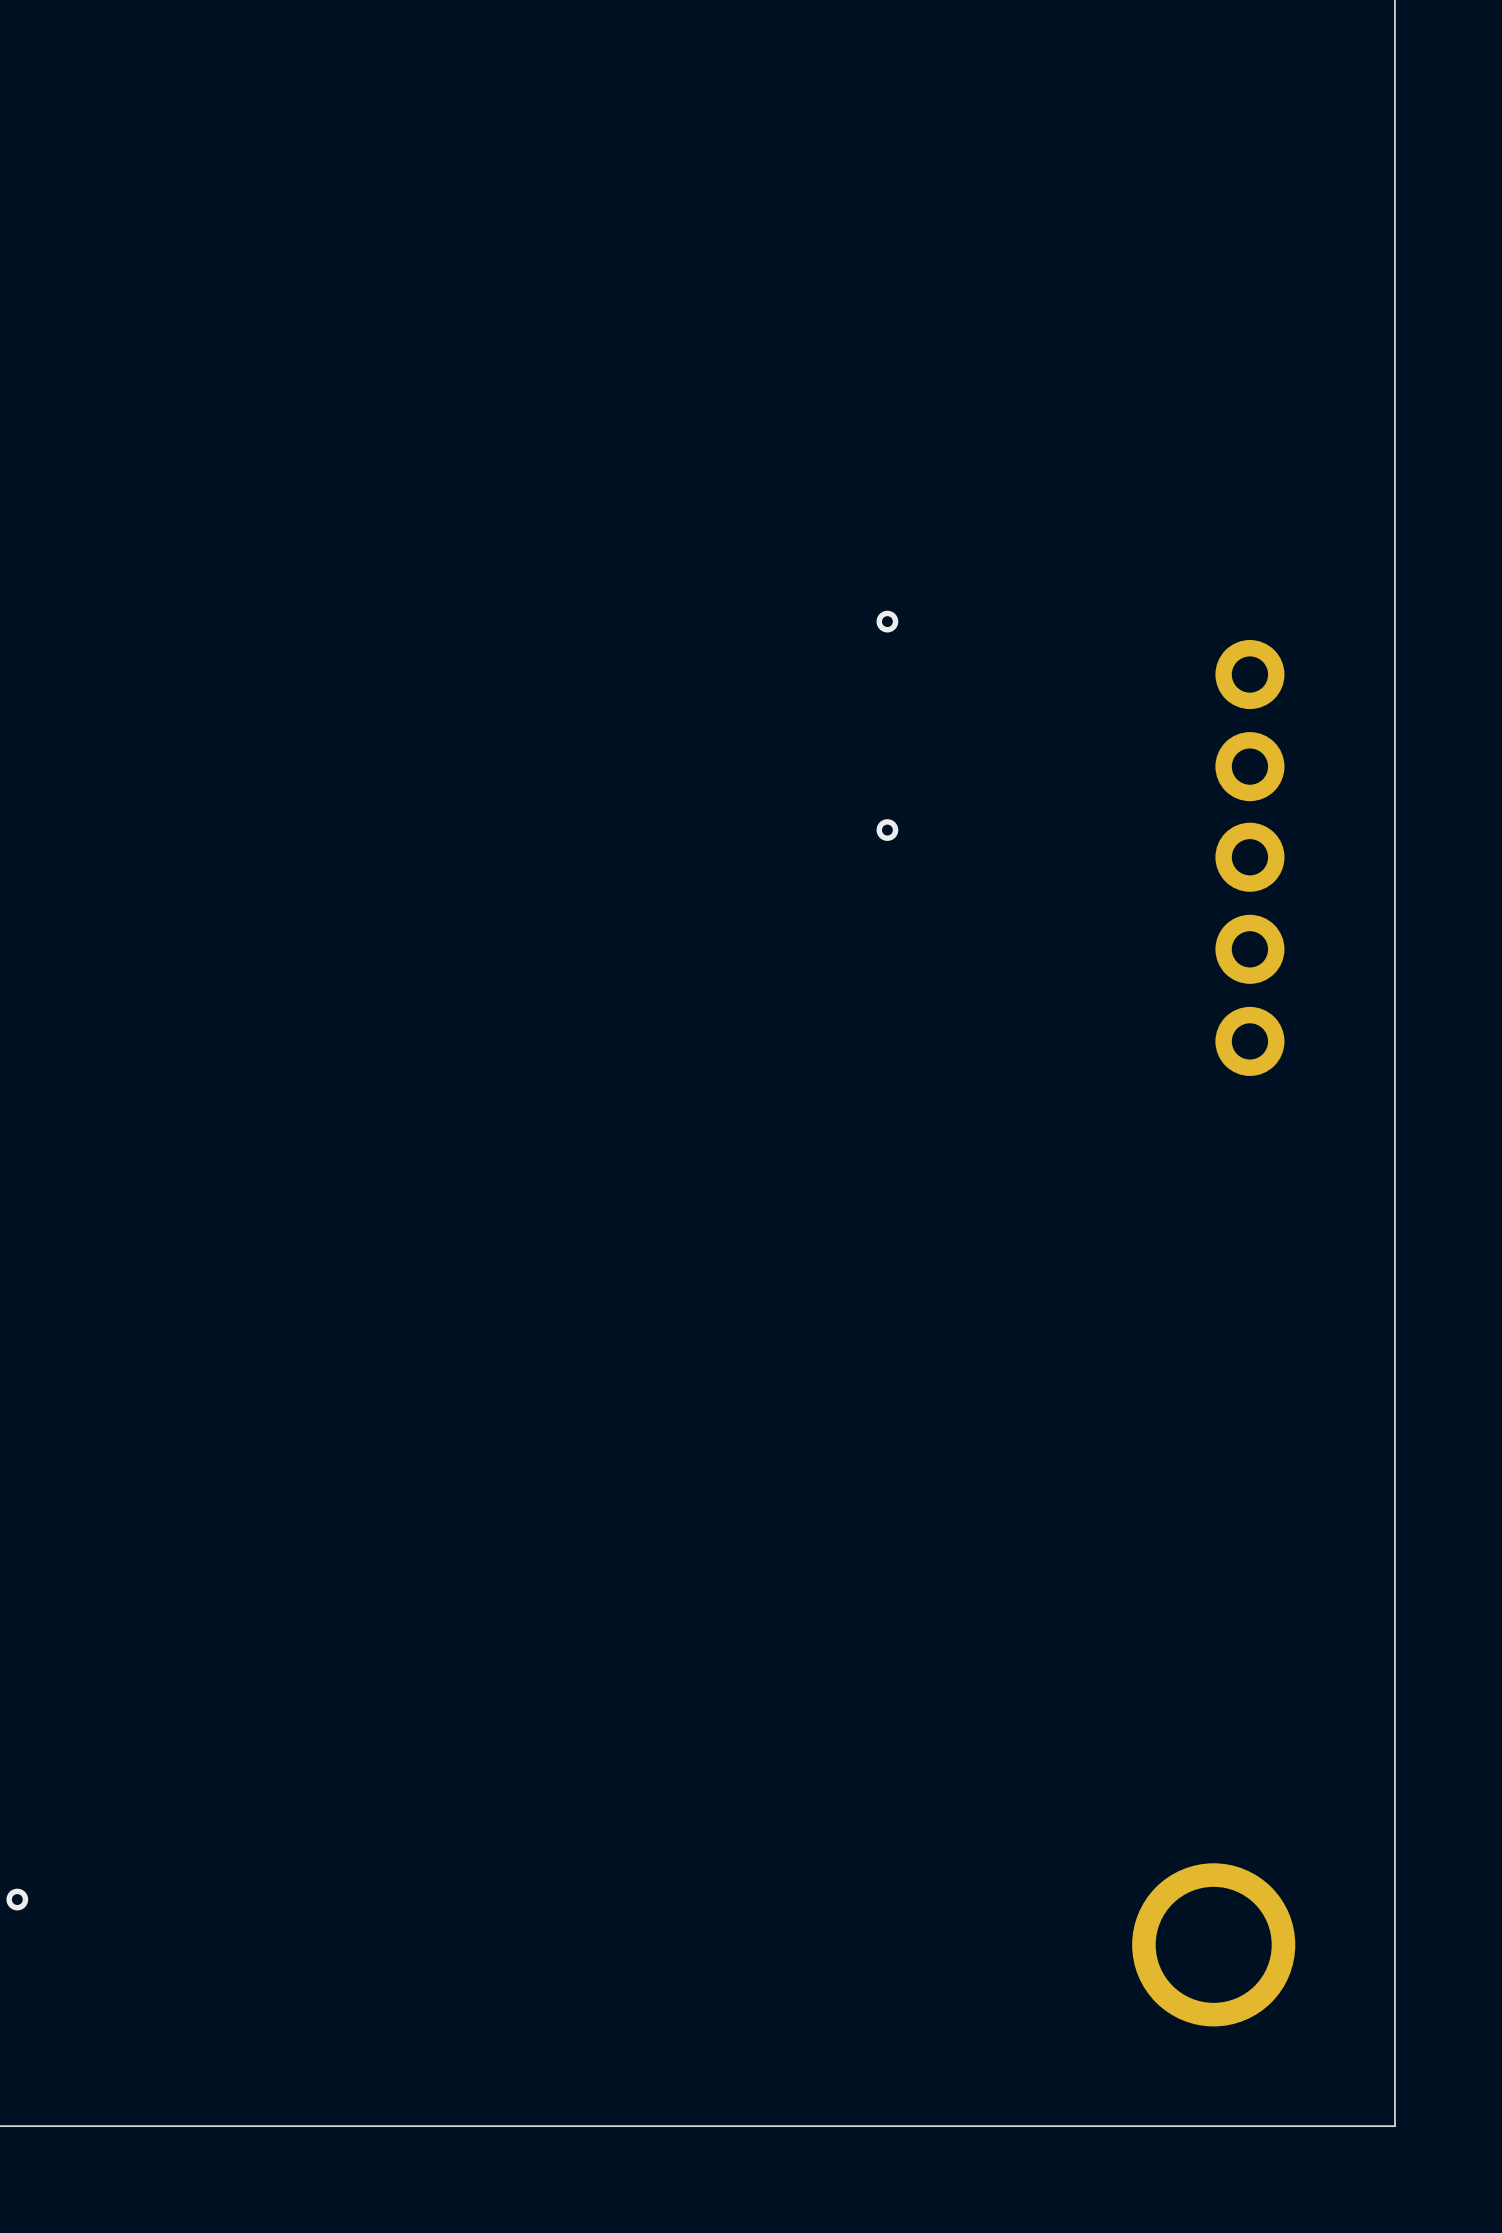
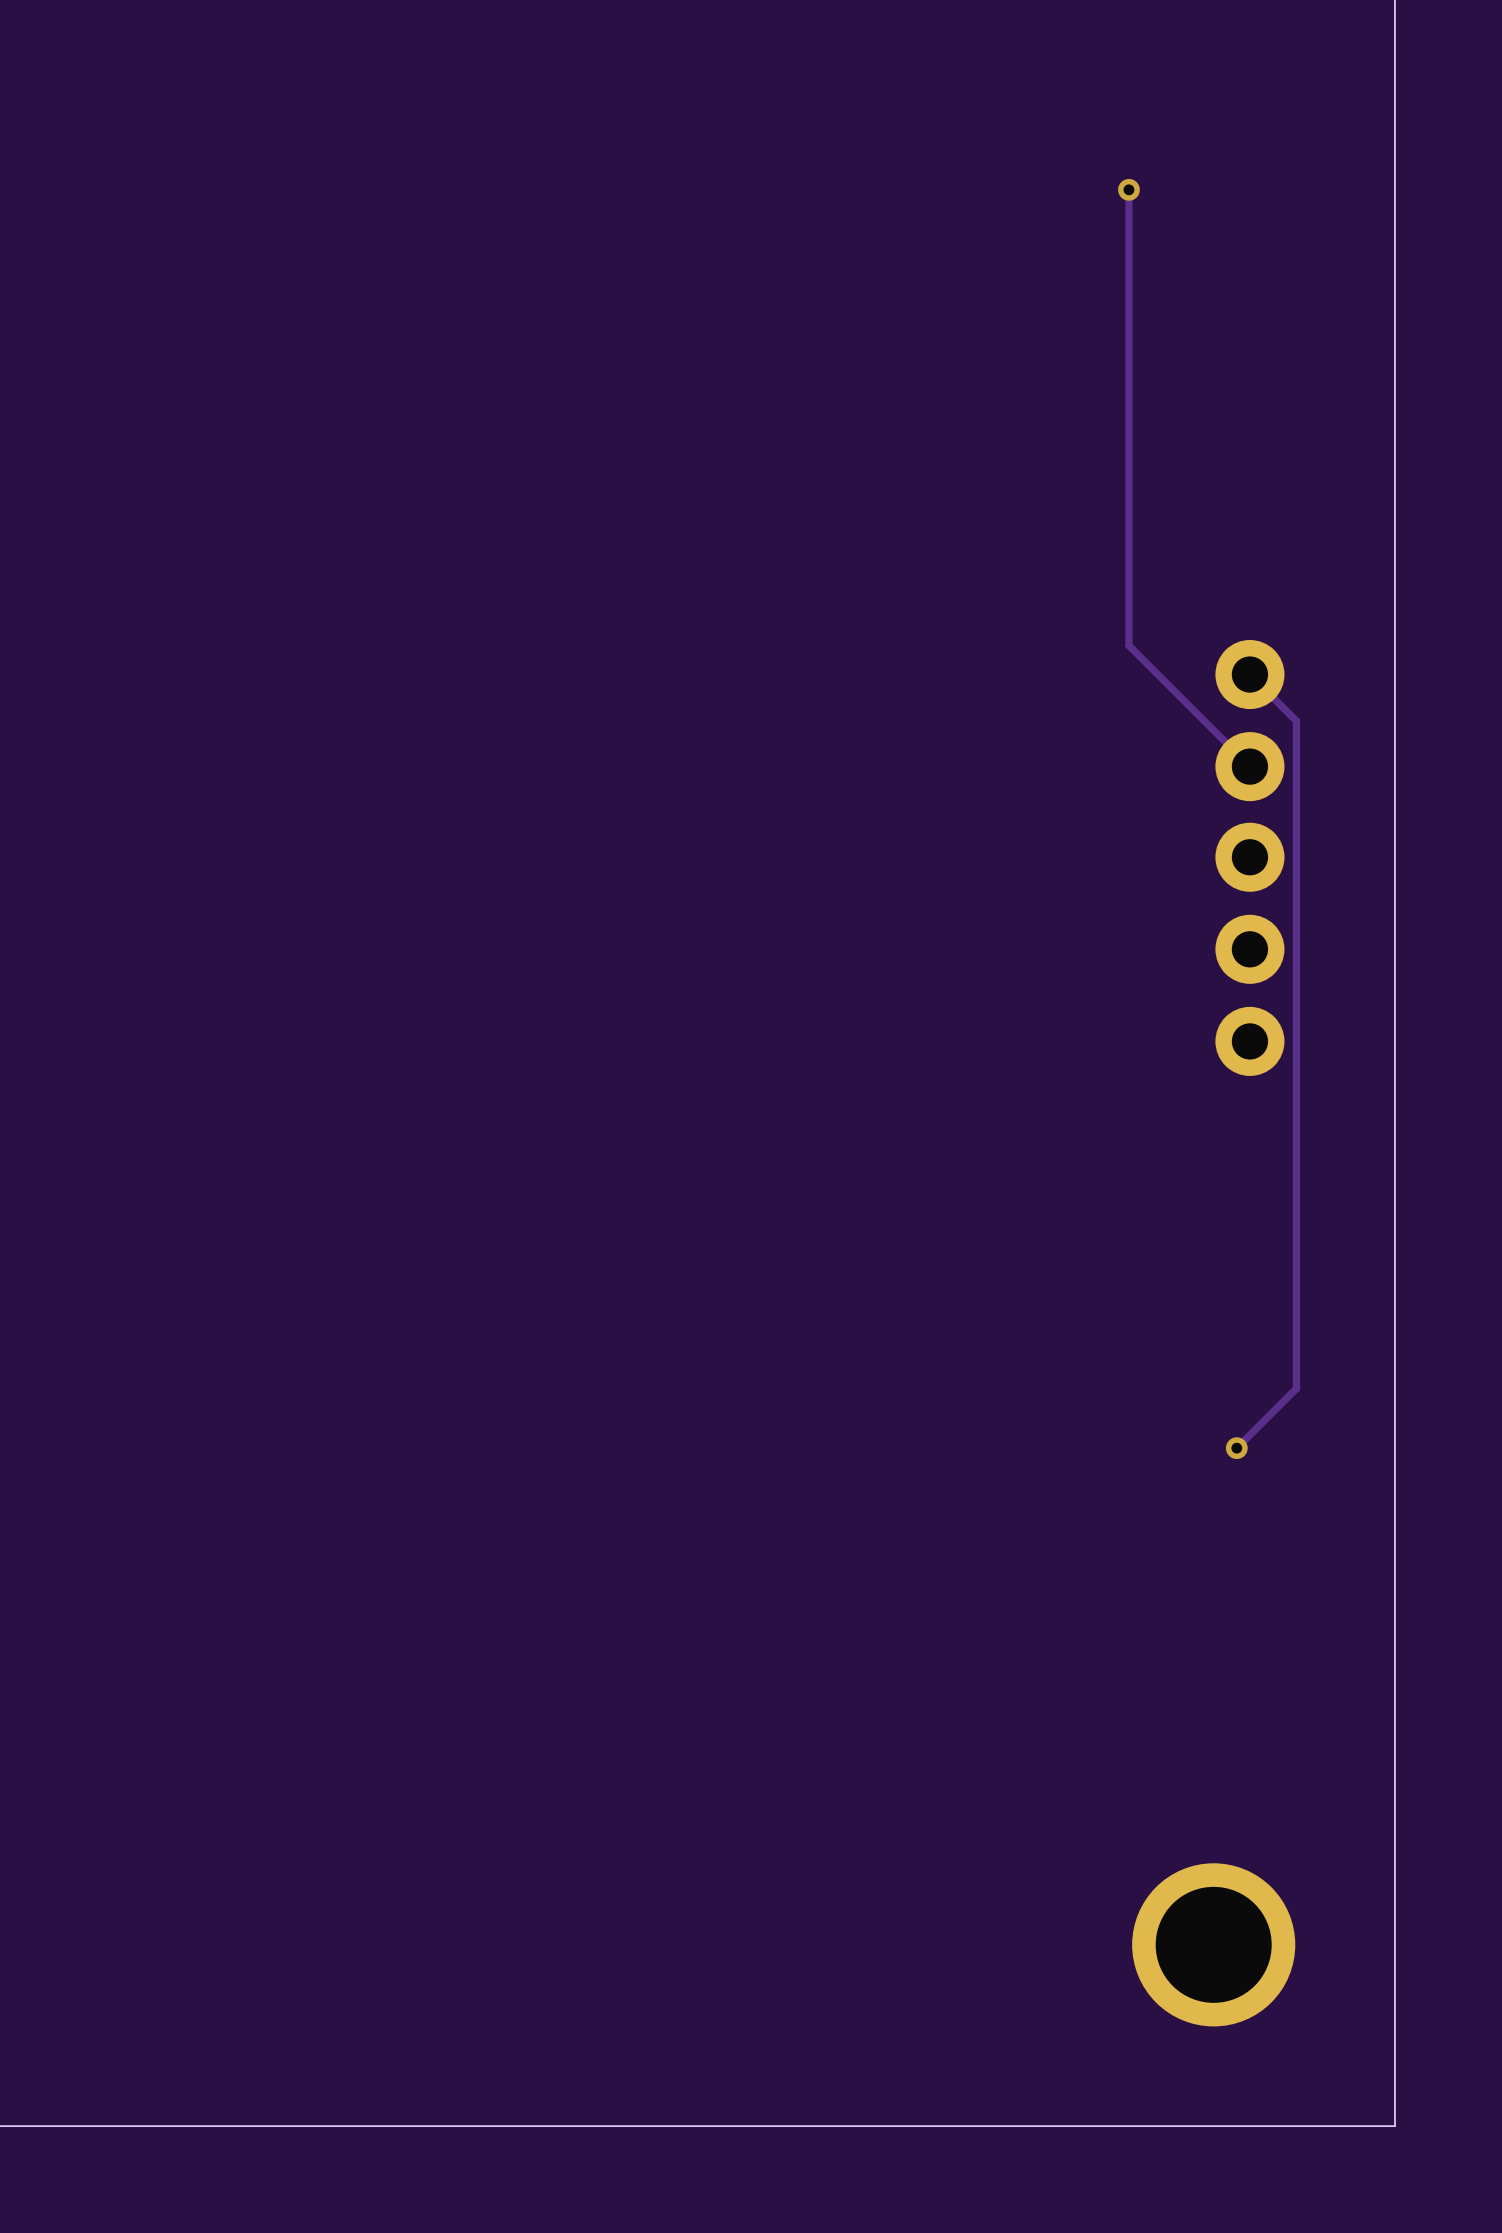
track: none -> (1128, 189) (1128, 645) (1249, 766)
via: none -> (1128, 189)
via: (887, 621) -> none
track: none -> (1249, 674) (1296, 721) (1296, 1388) (1236, 1448)
via: (887, 830) -> none
via: none -> (1236, 1448)
via: (17, 1899) -> none

